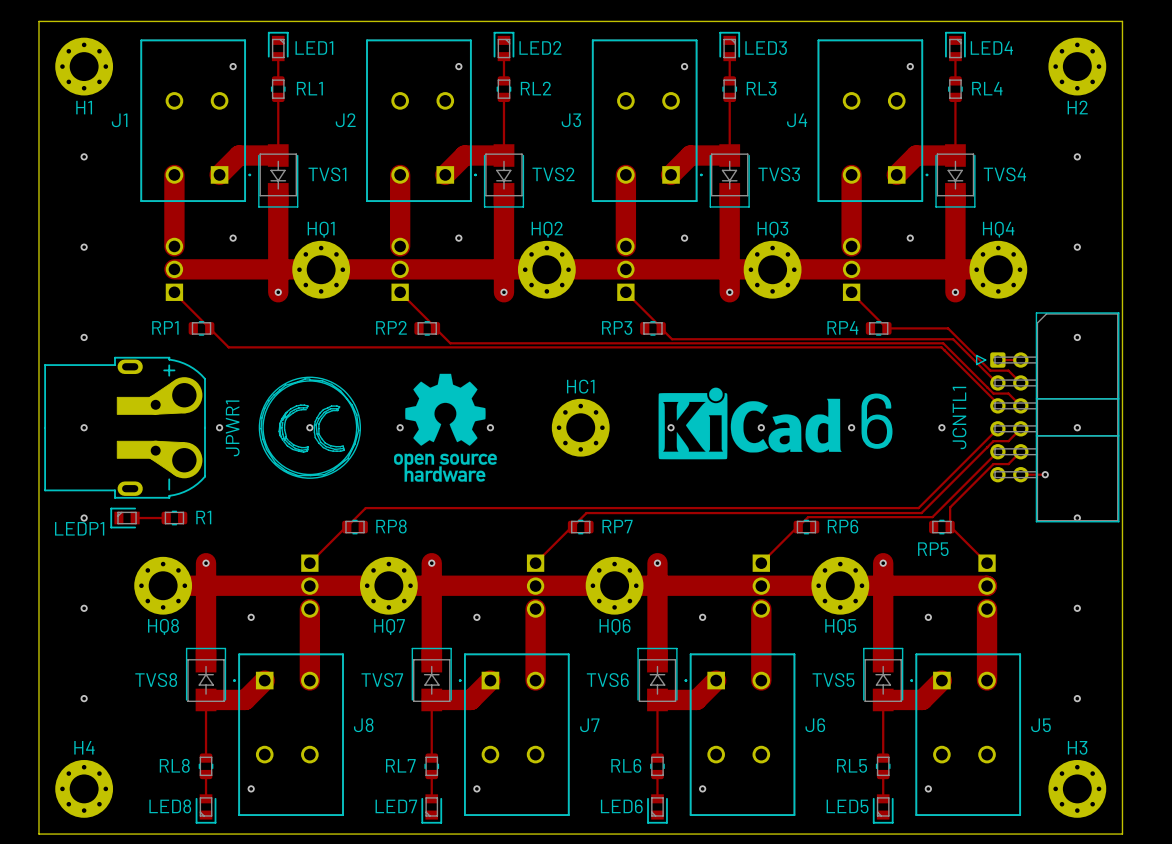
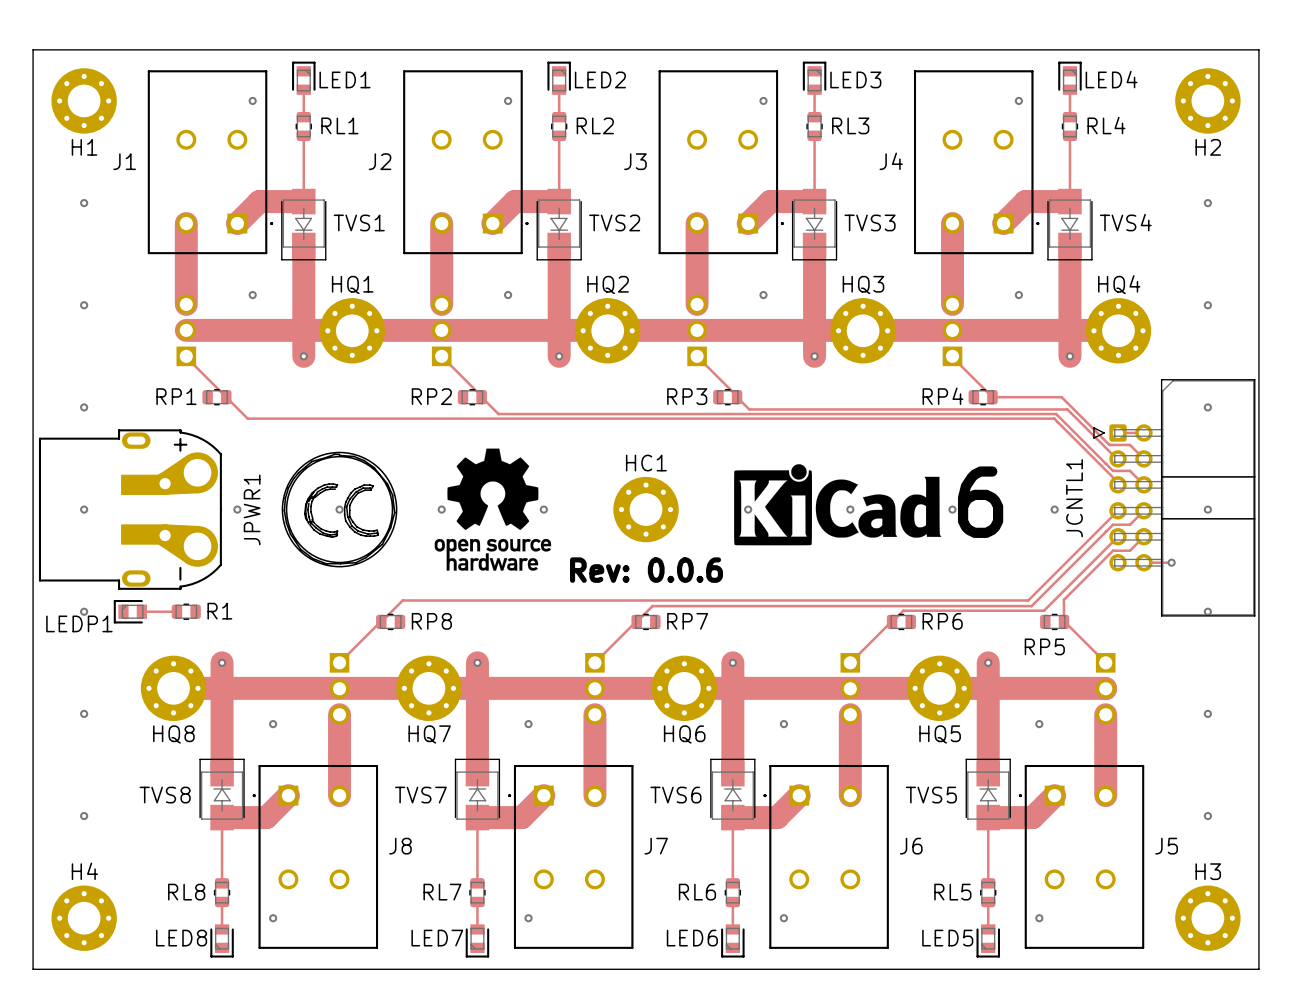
text: none -> Rev: 0.0.6 (646, 570)

